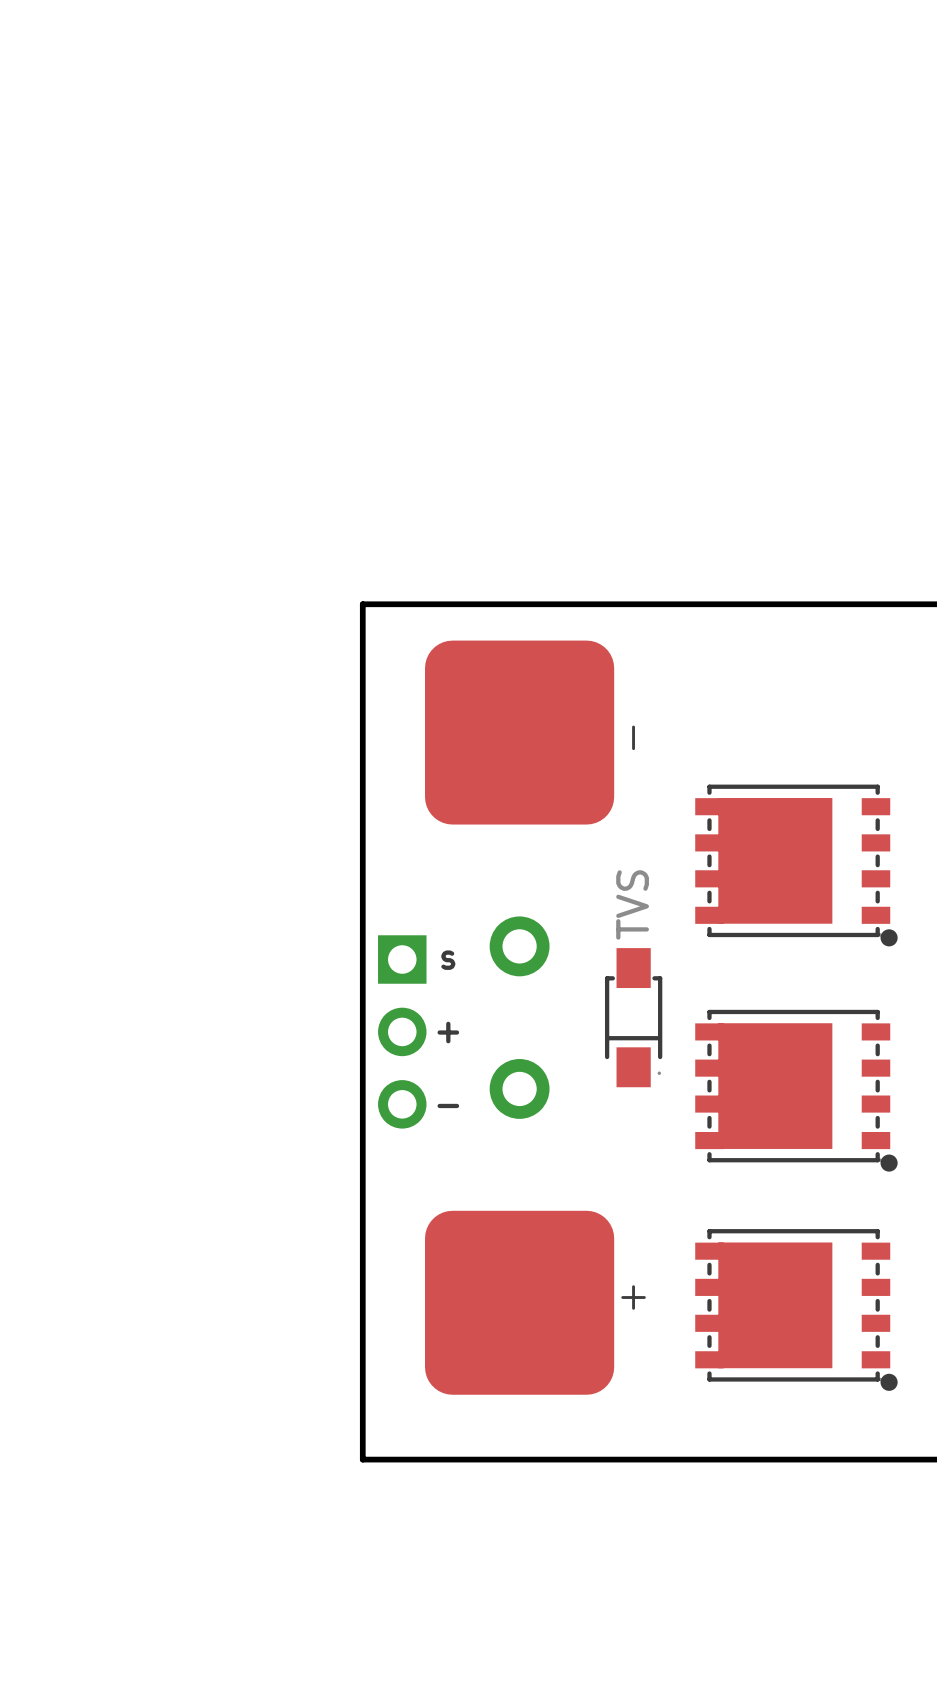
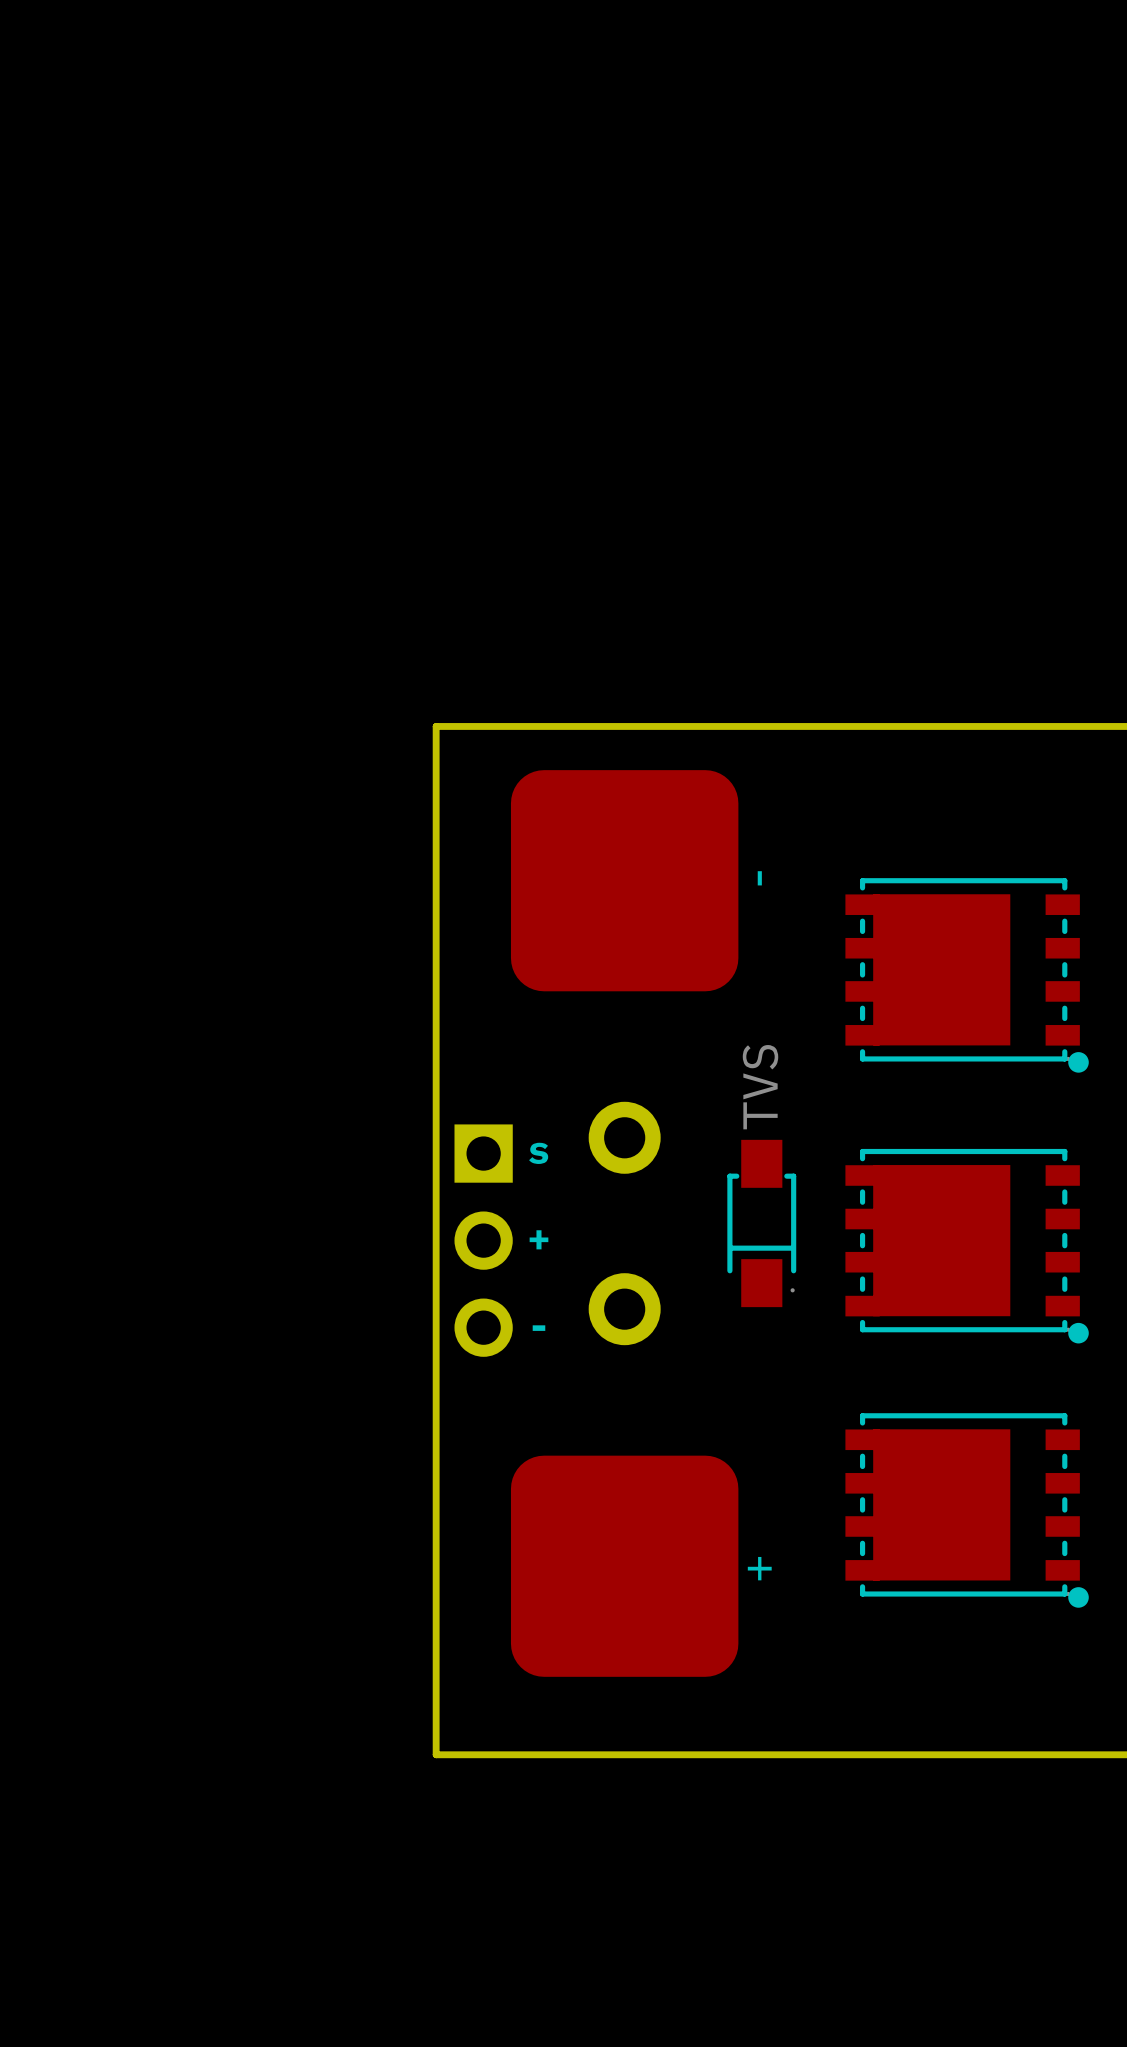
part position: (796, 865) -> (967, 975)
part position: (796, 1090) -> (967, 1246)
part position: (796, 1309) -> (967, 1510)

